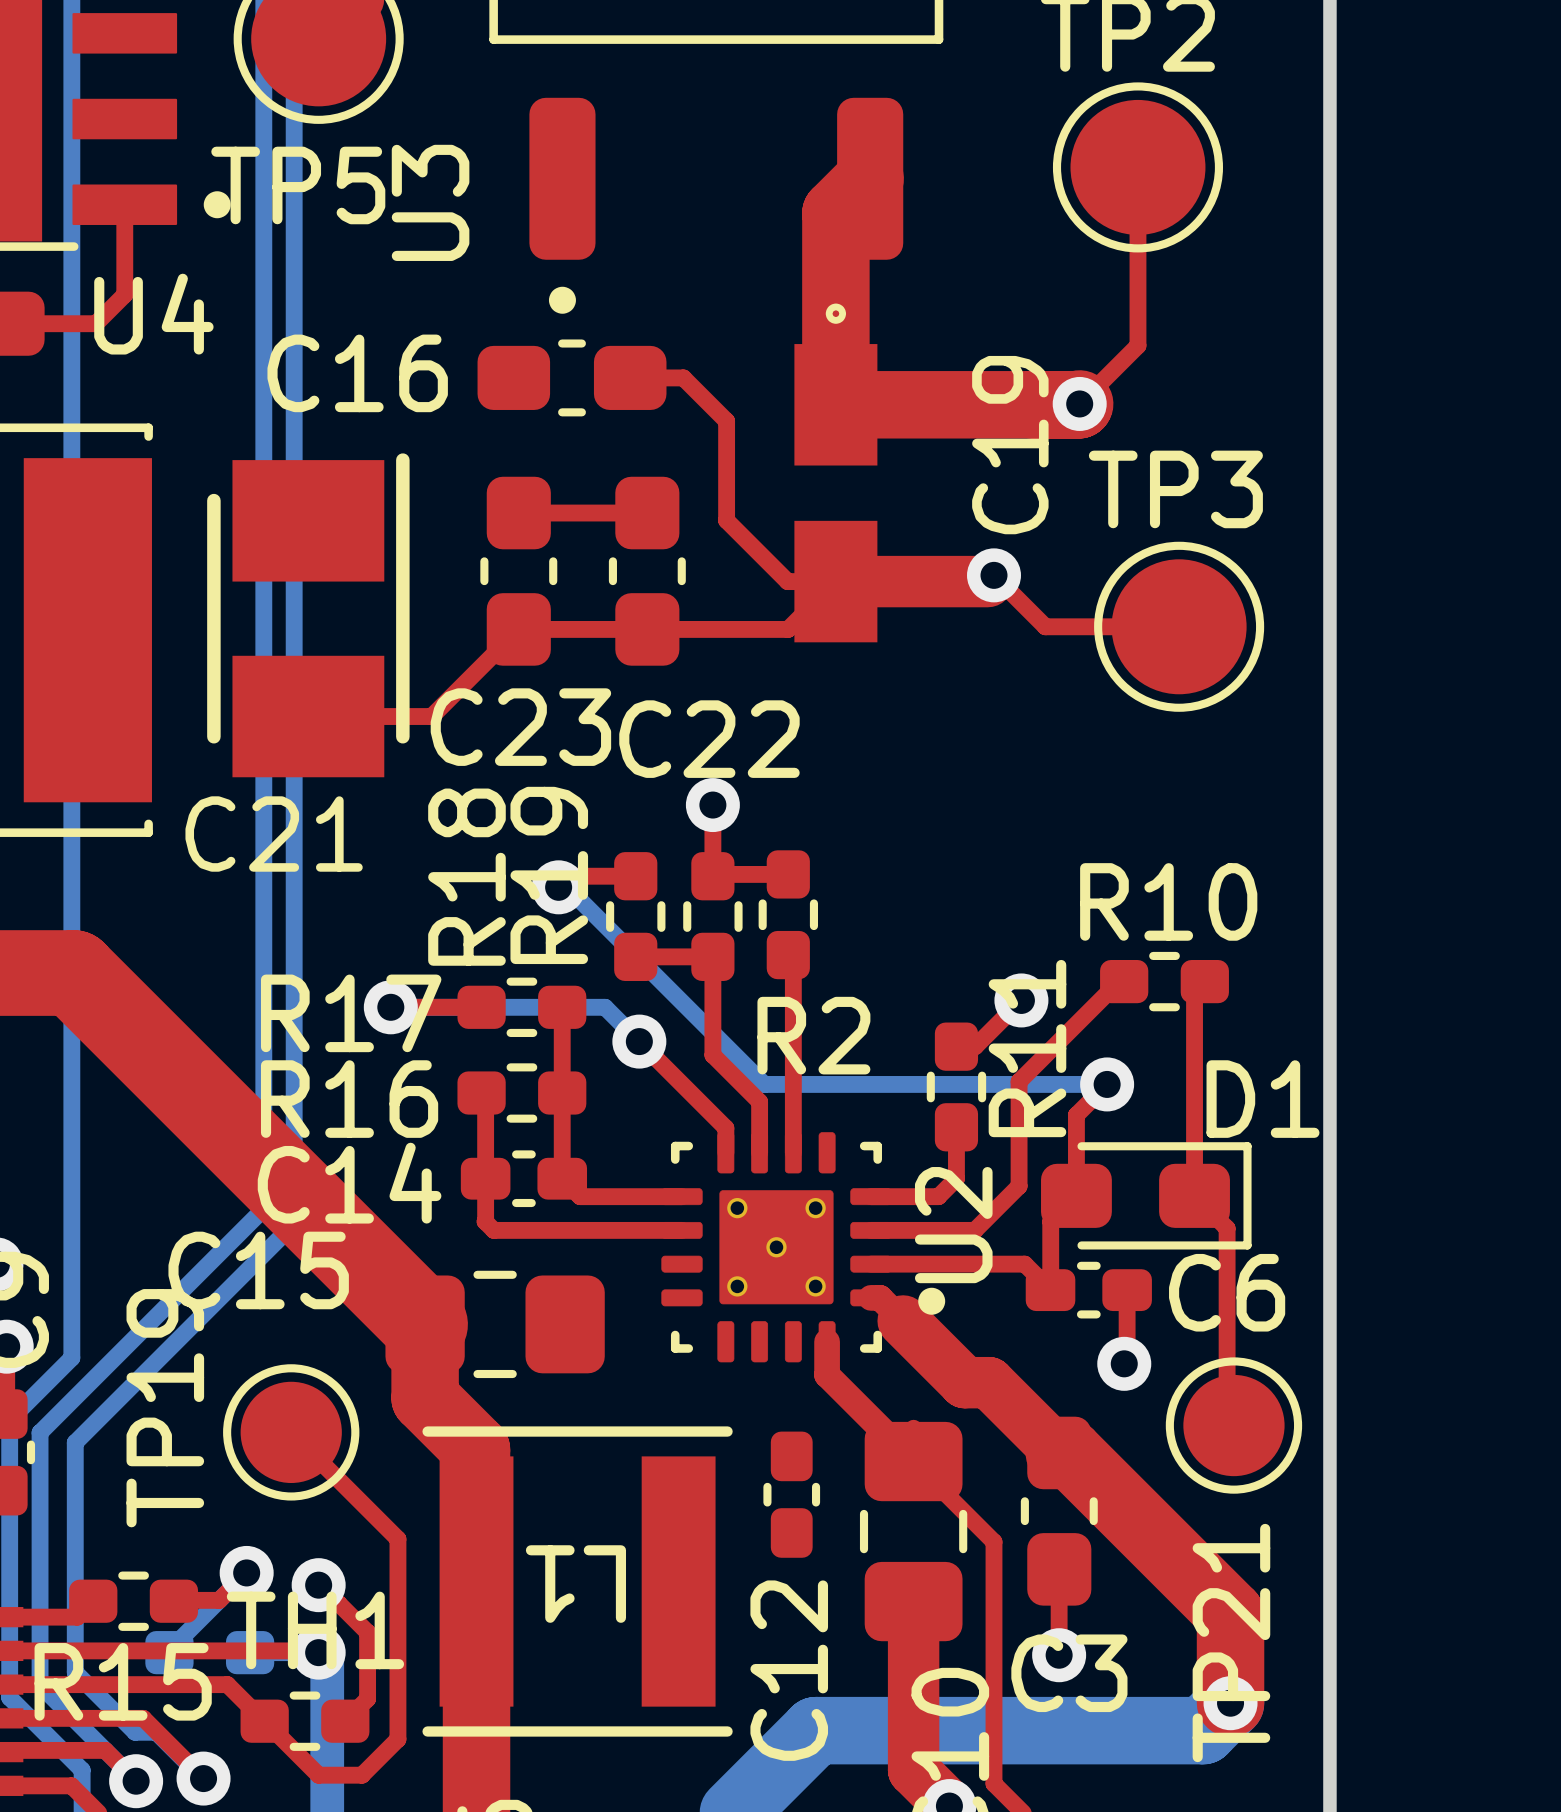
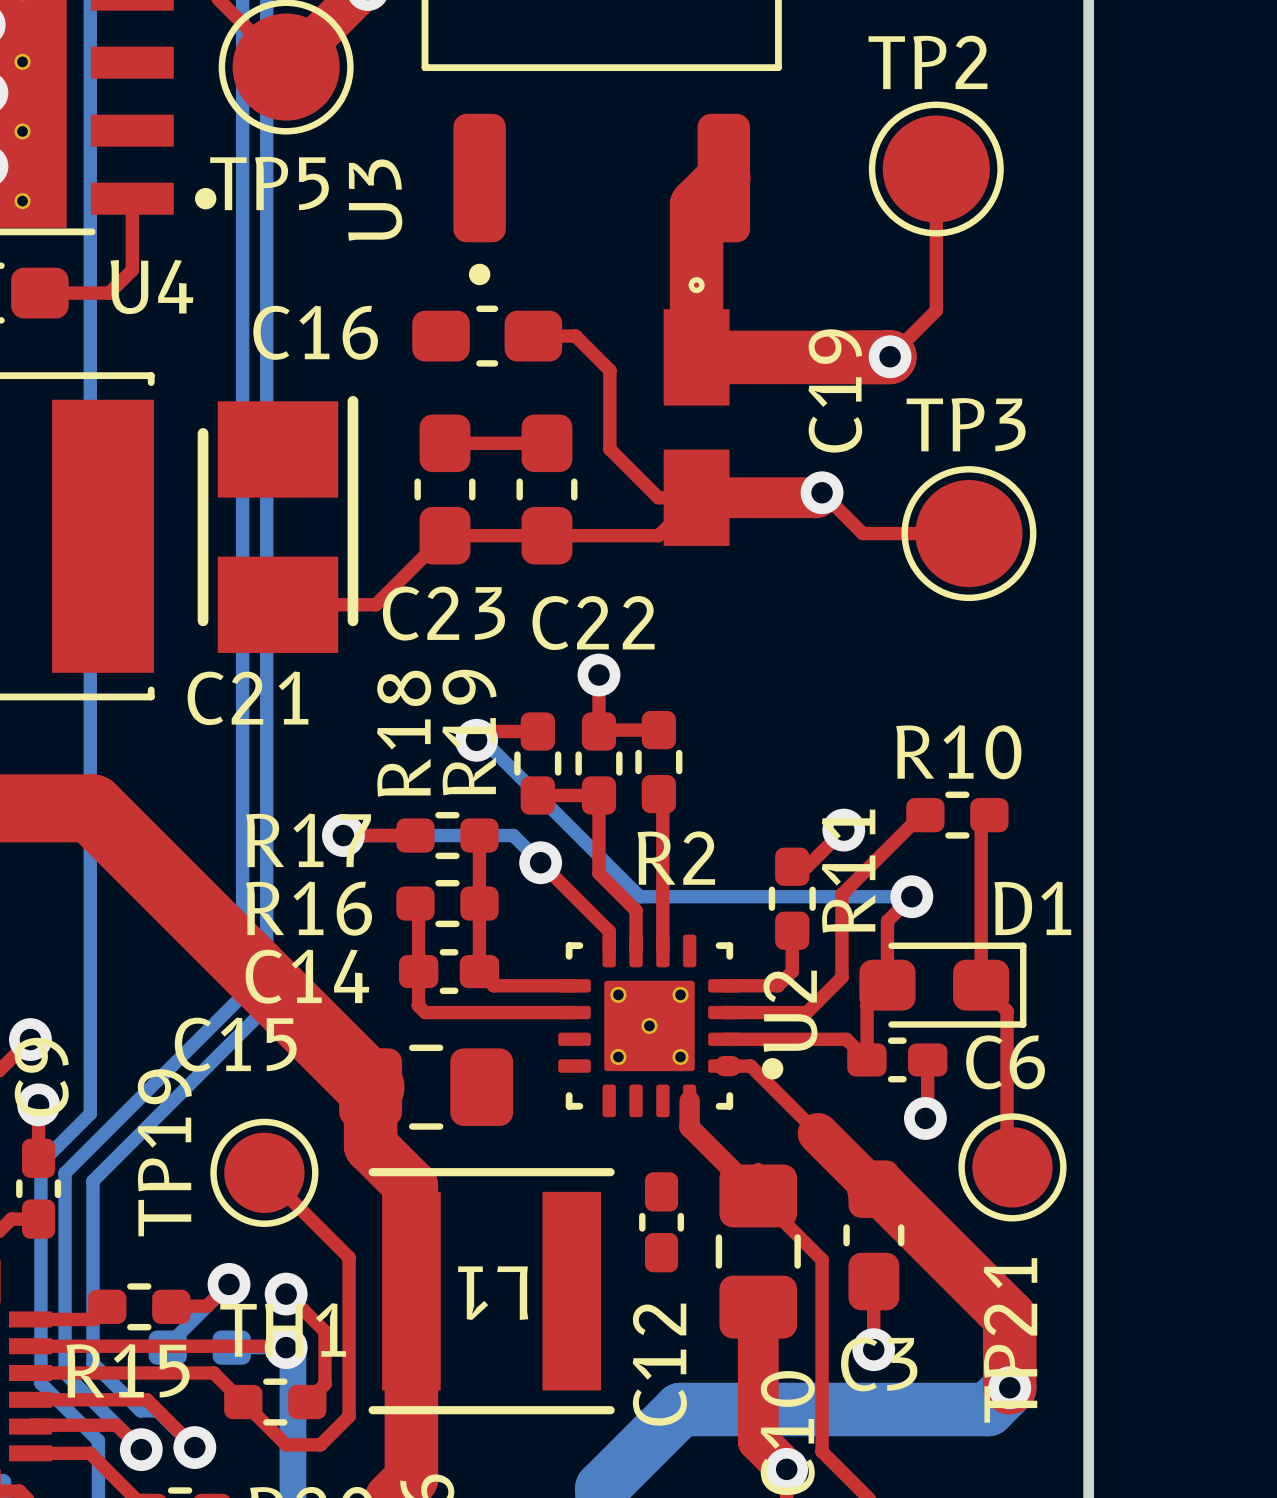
top track: (880, 1297) (964, 1382) (989, 1382) -> (731, 1066) (750, 1066) (818, 1133)

